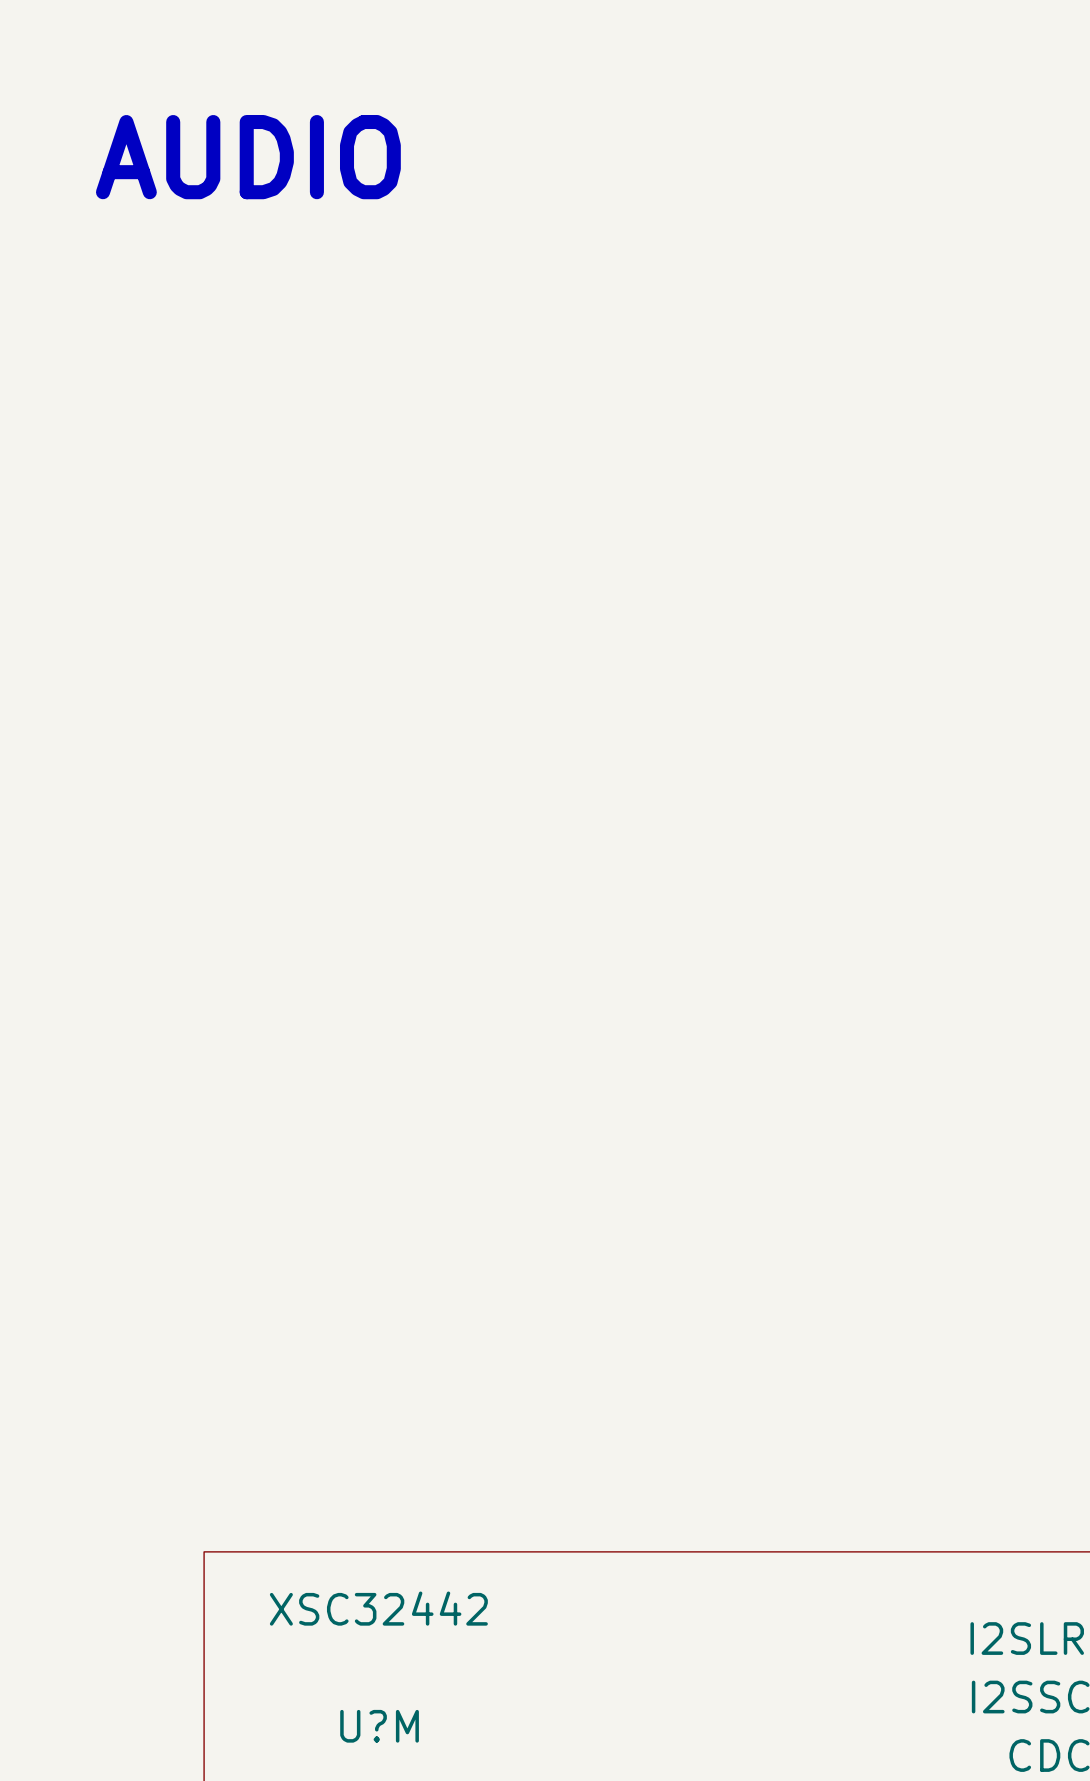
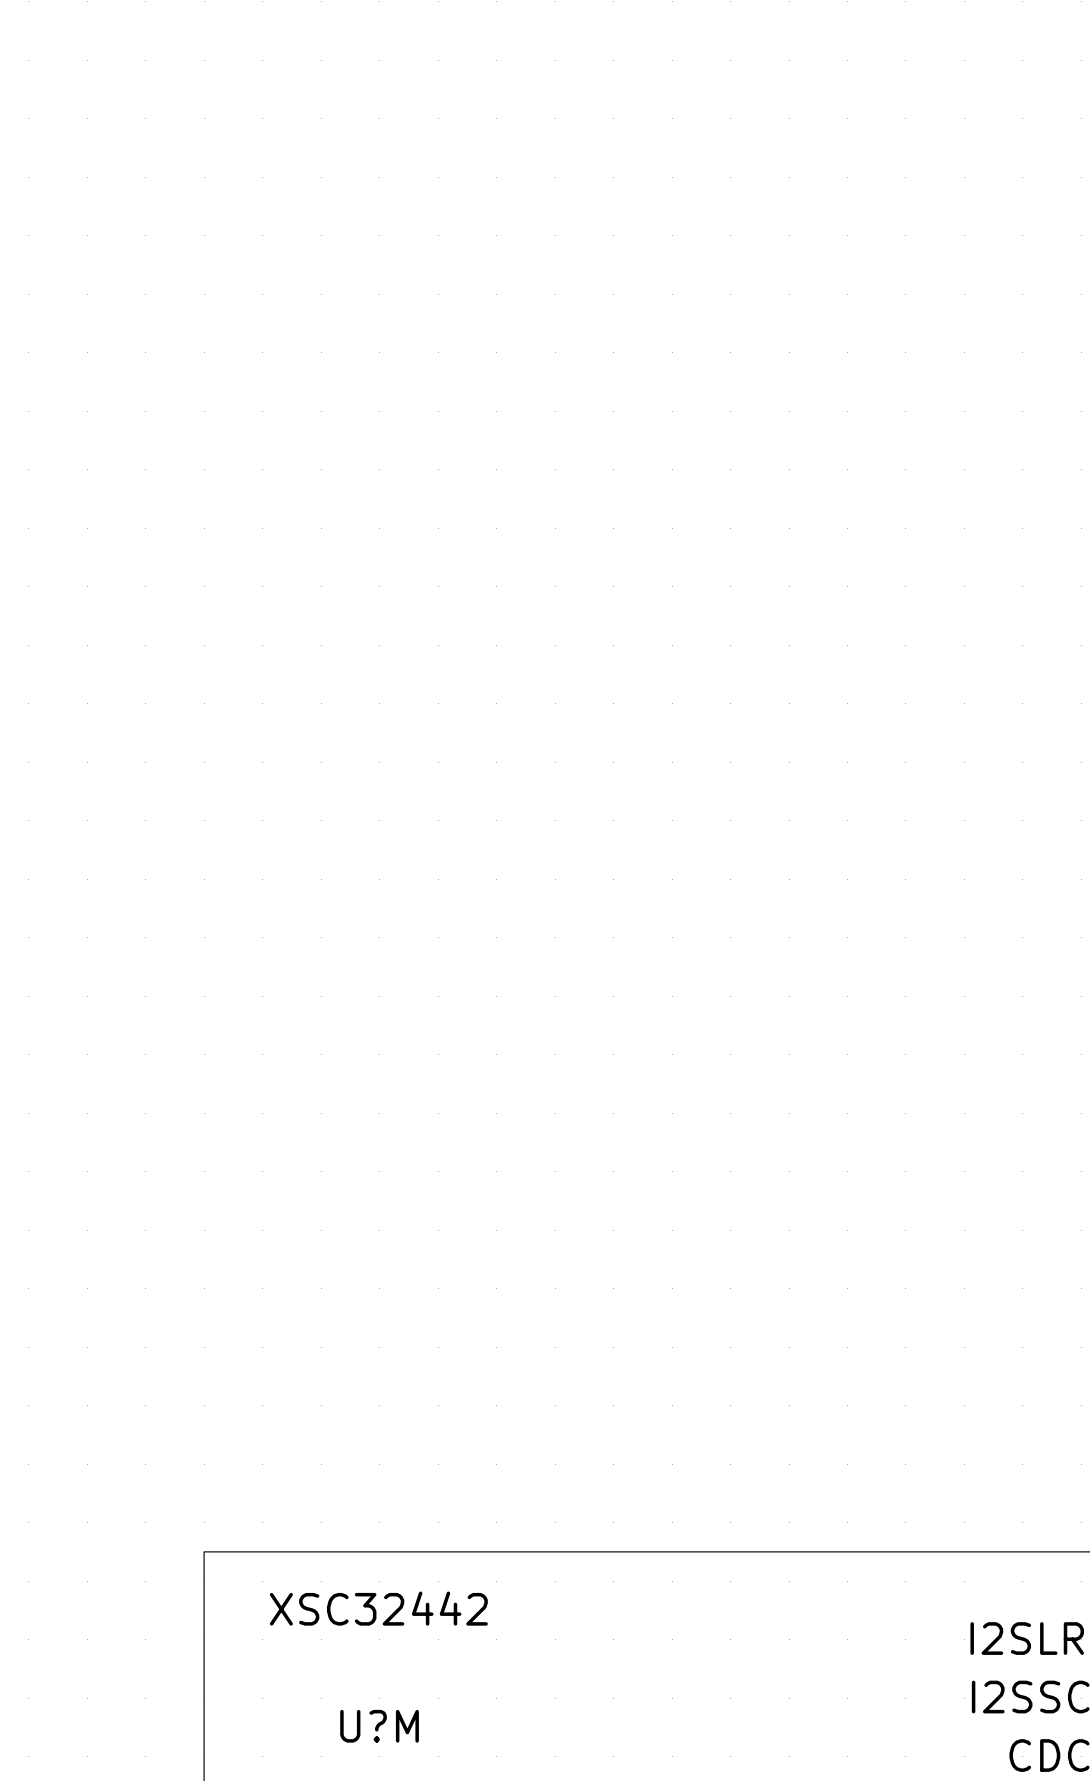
text: AUDIO (248, 157) -> none

